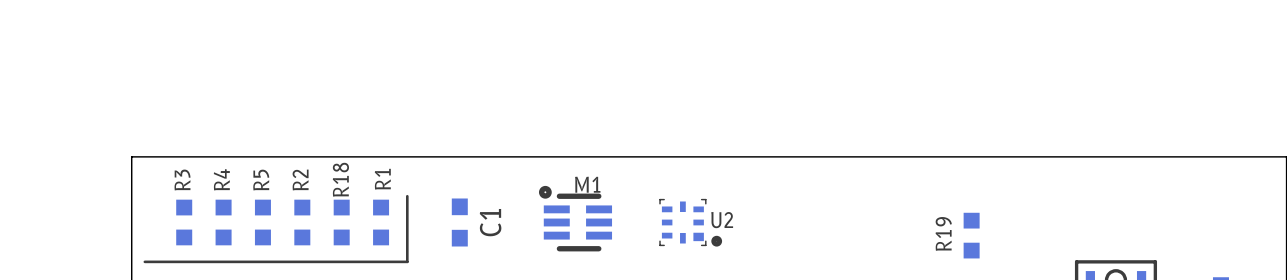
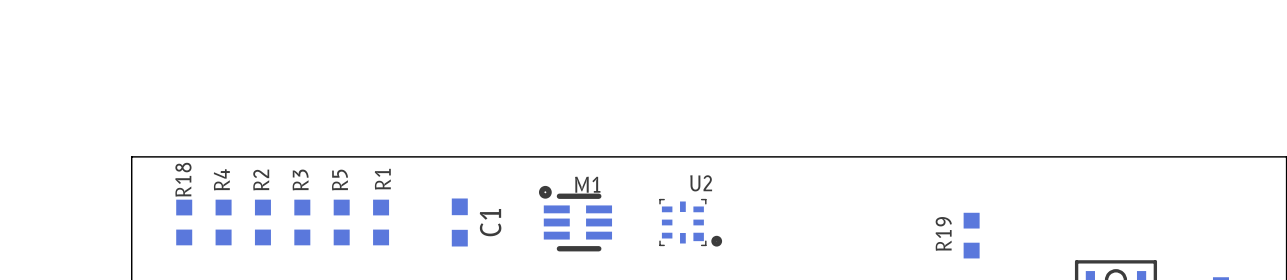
R18 name: R18 (340, 179) -> R5 (339, 180)
R3 name: R3 (182, 180) -> R18 (183, 179)
R5 name: R5 (261, 180) -> R2 (261, 180)
R2 name: R2 (300, 180) -> R3 (300, 180)
line: (407, 196) (407, 261) (144, 261) -> none
U2 name position: U2 (722, 220) -> U2 (701, 183)

